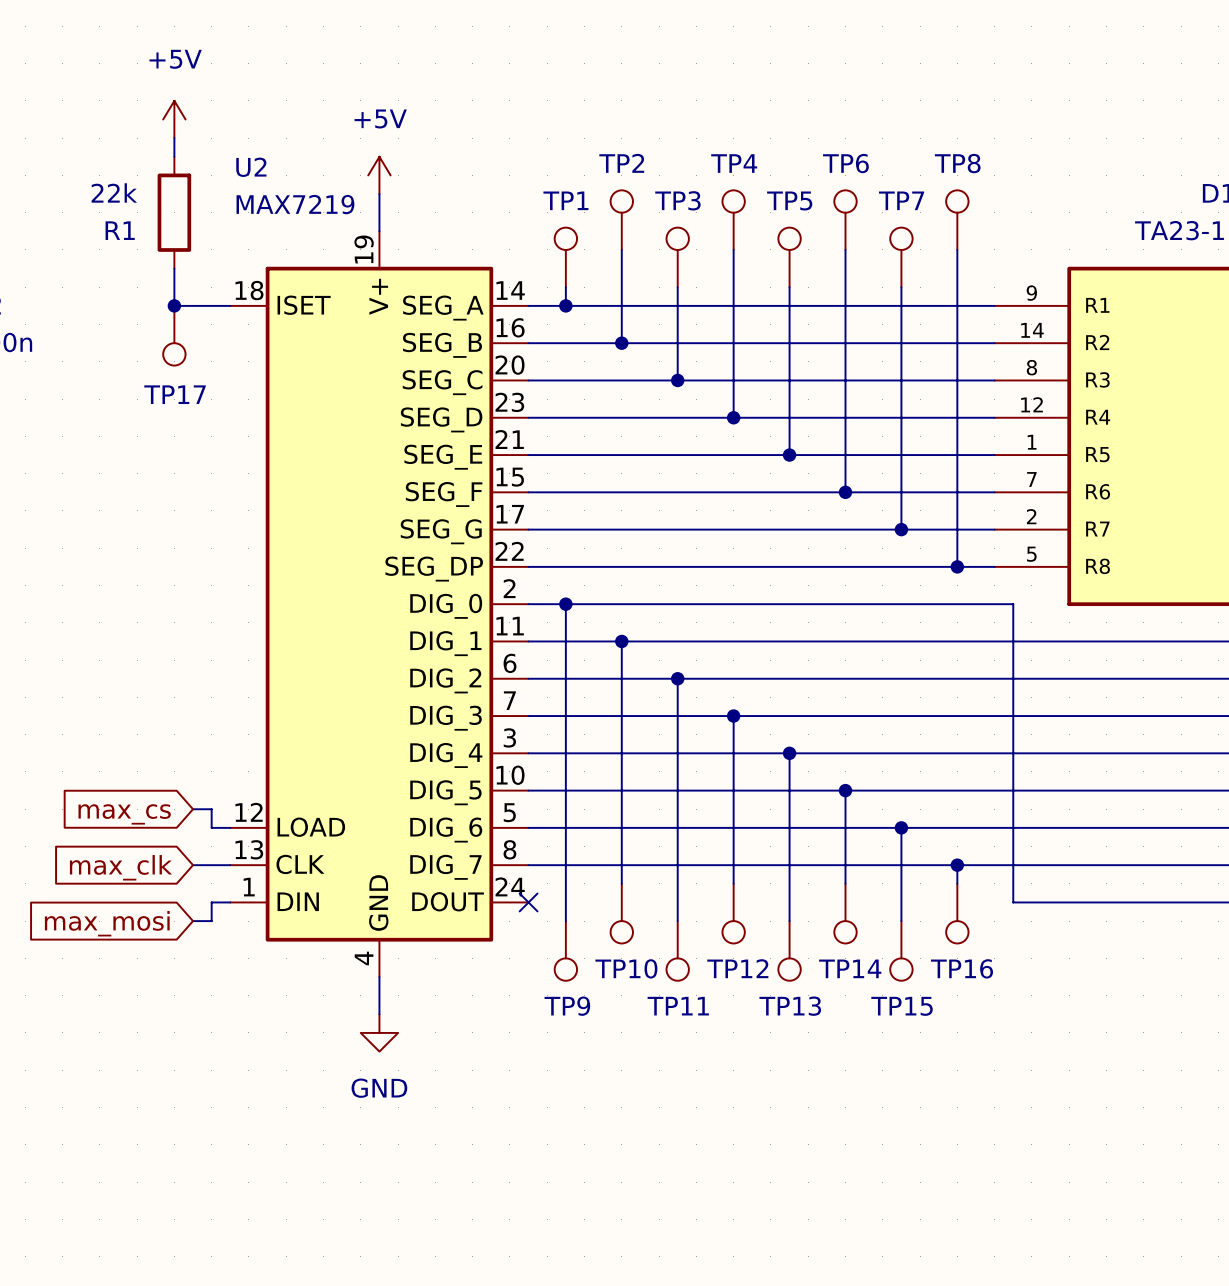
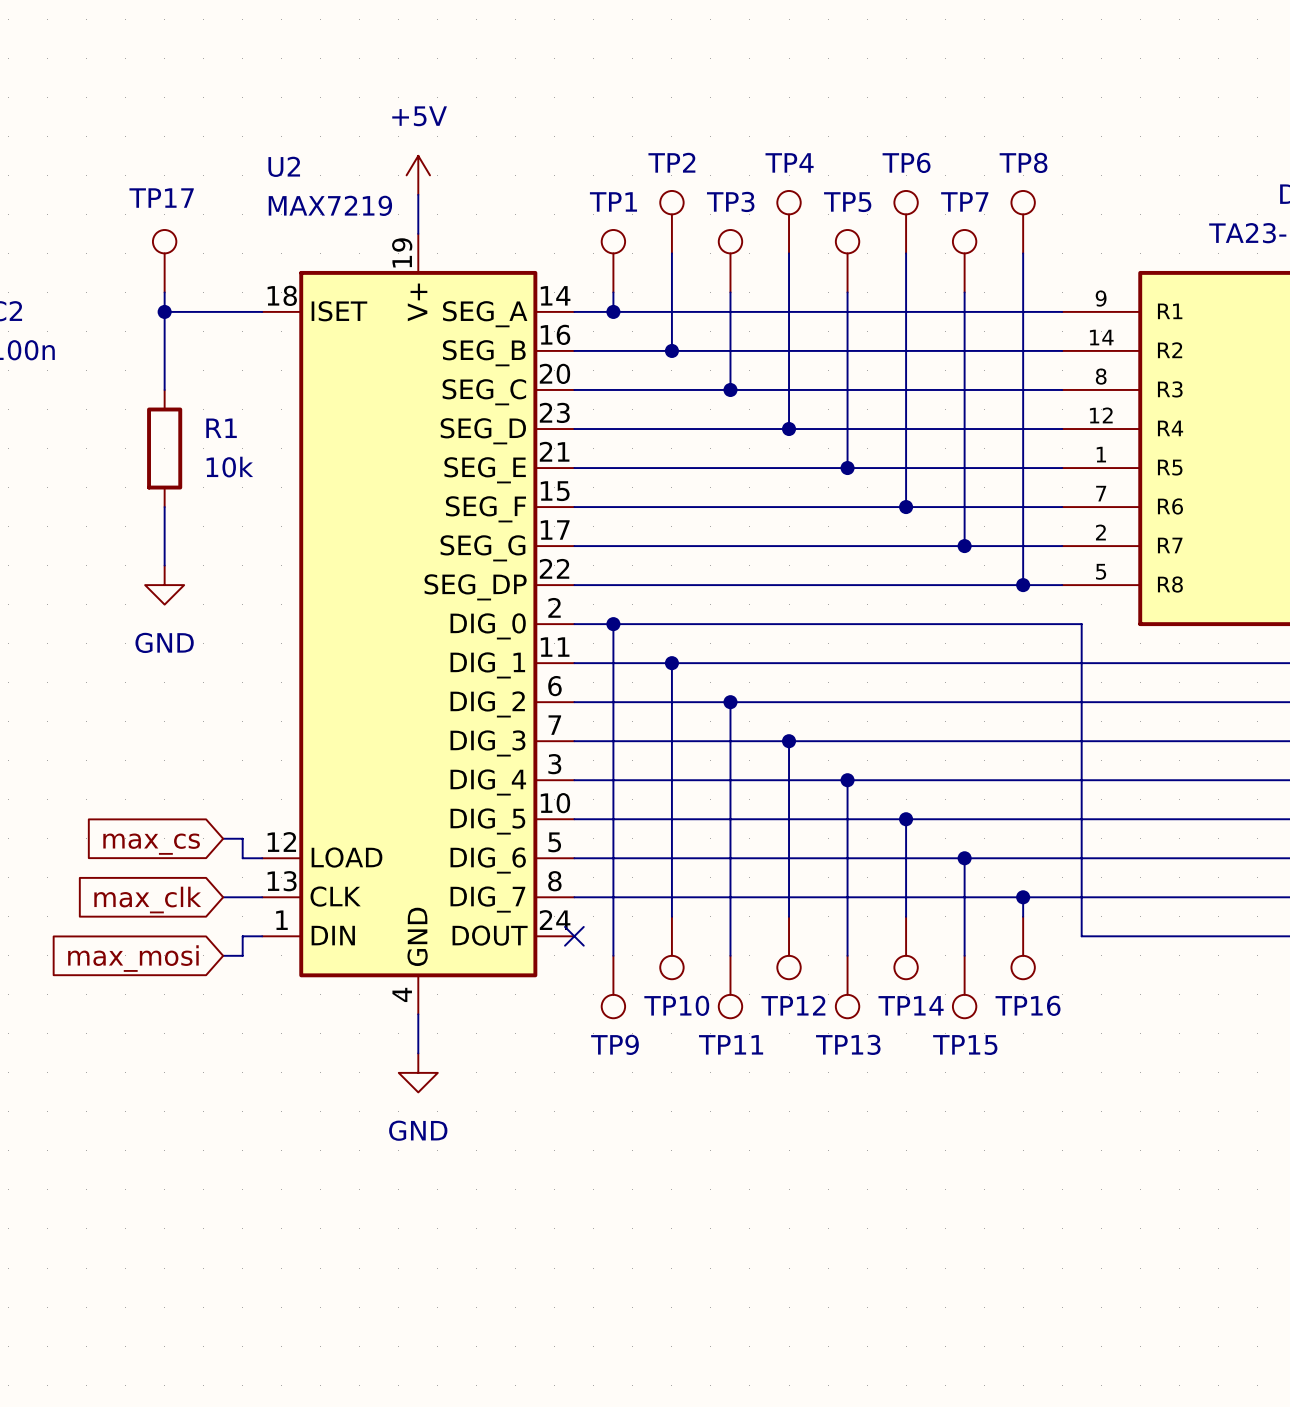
power symbol: +5V (174, 119) -> none
wire: (174, 138) (174, 156) -> none
R1 value: 22k (114, 192) -> 10k (229, 467)
R1 position: (174, 212) -> (164, 448)
R1 name position: R1 (120, 230) -> R1 (221, 428)
wire: (174, 268) (174, 305) -> (164, 311) (203, 311)
wire: none -> (164, 292) (164, 389)
junction position: (174, 305) -> (164, 311)
TP17 position: (174, 335) -> (164, 261)
TP17 rotation: 0° (174, 354) -> 180° (164, 241)
wire: none -> (164, 507) (164, 565)
power symbol: none -> GND (164, 585)

